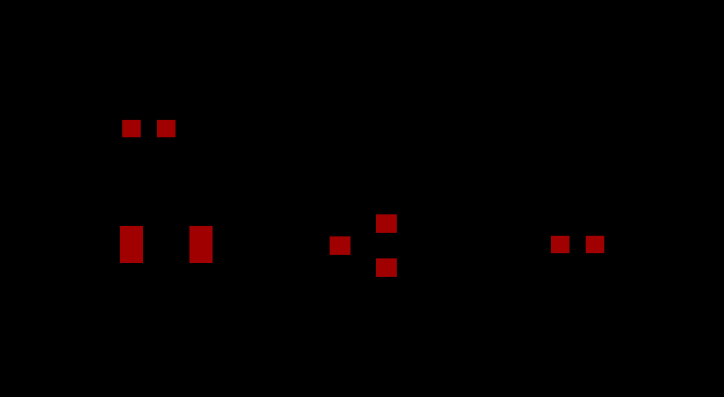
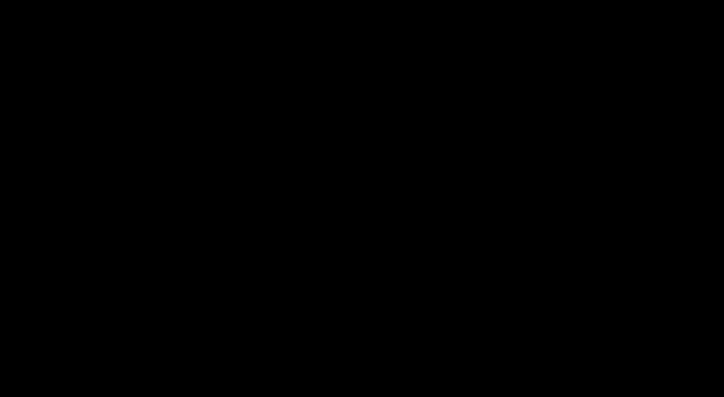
part: (148, 128) -> none
part: (166, 244) -> none
part: (577, 244) -> none
part: (363, 245) -> none

